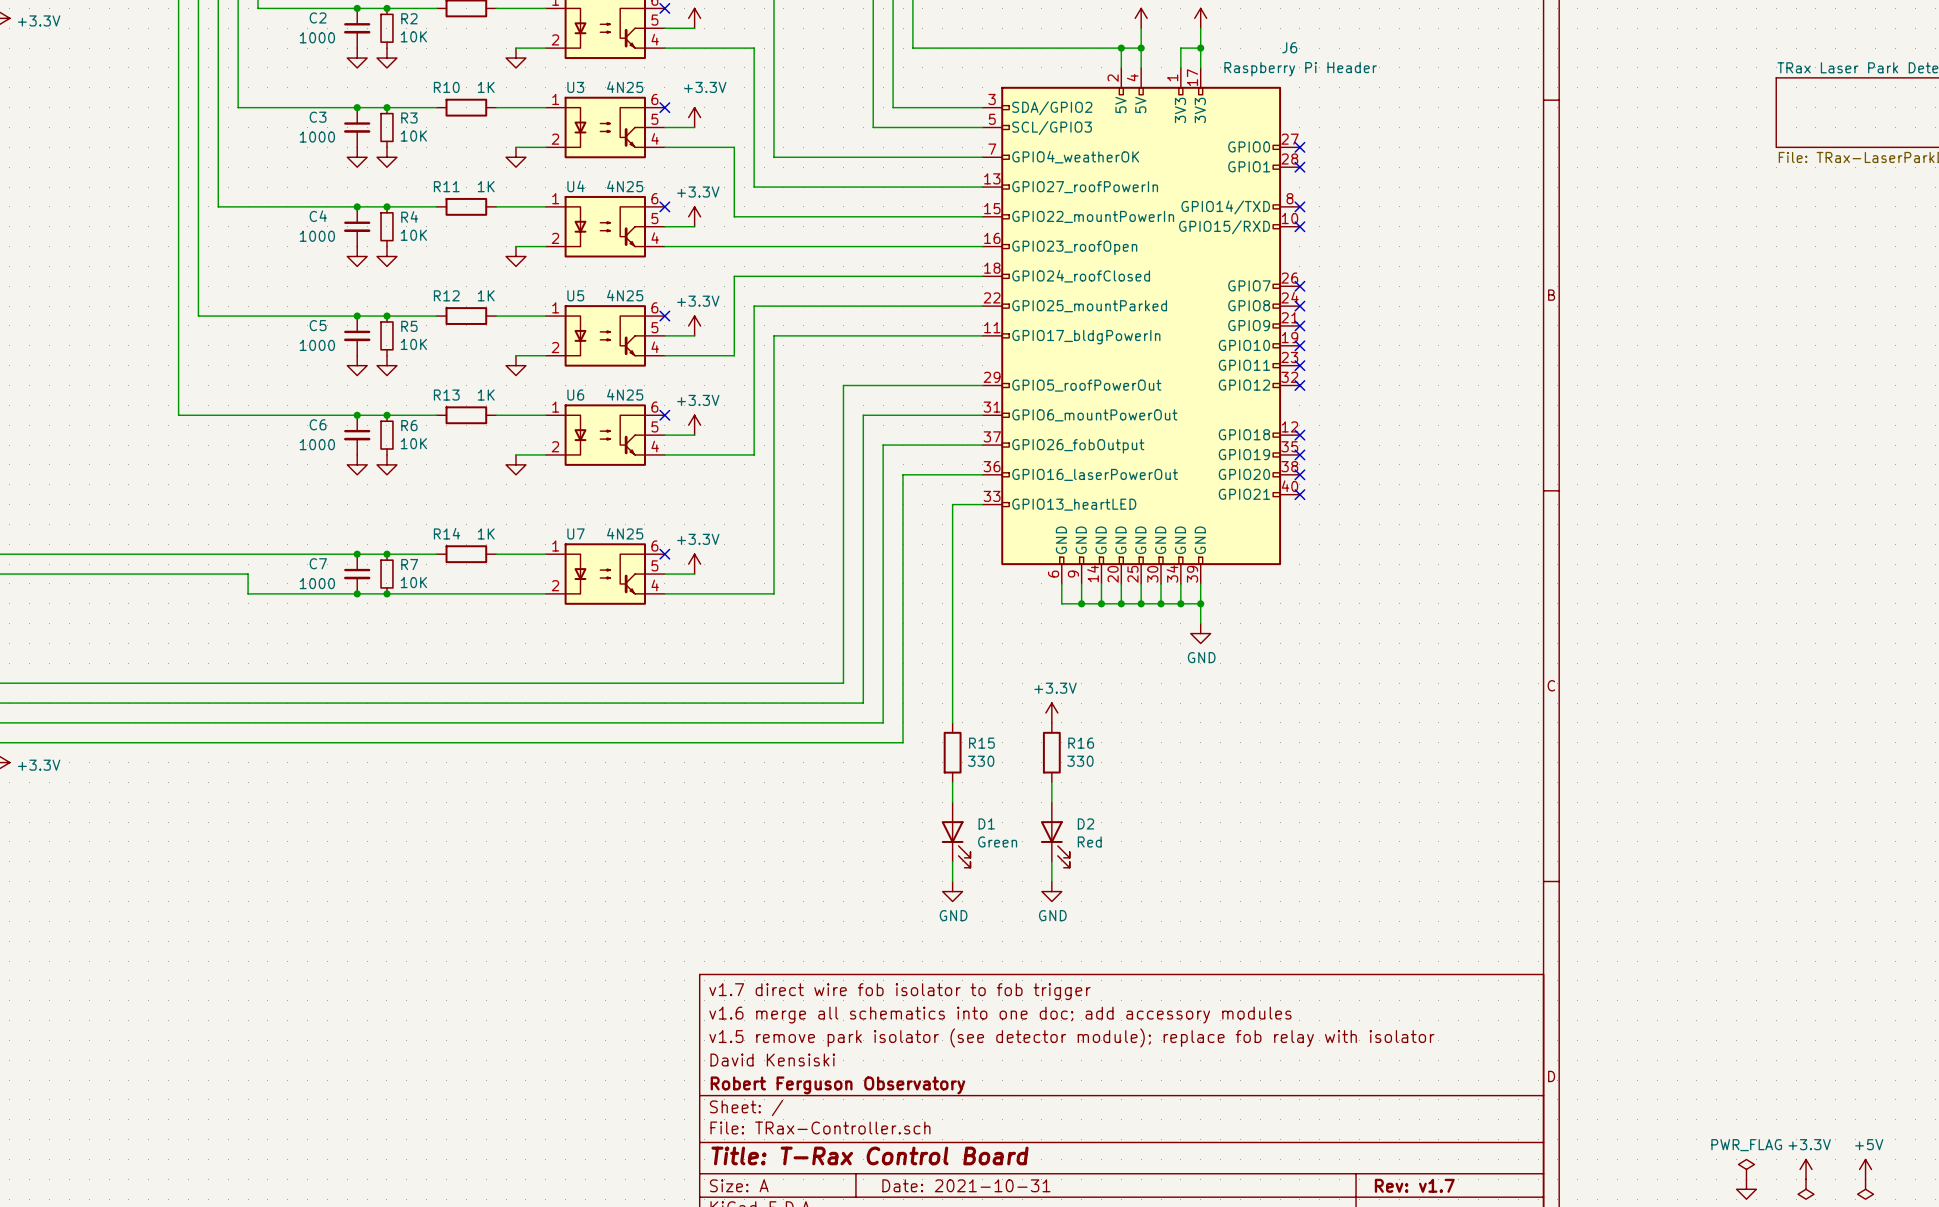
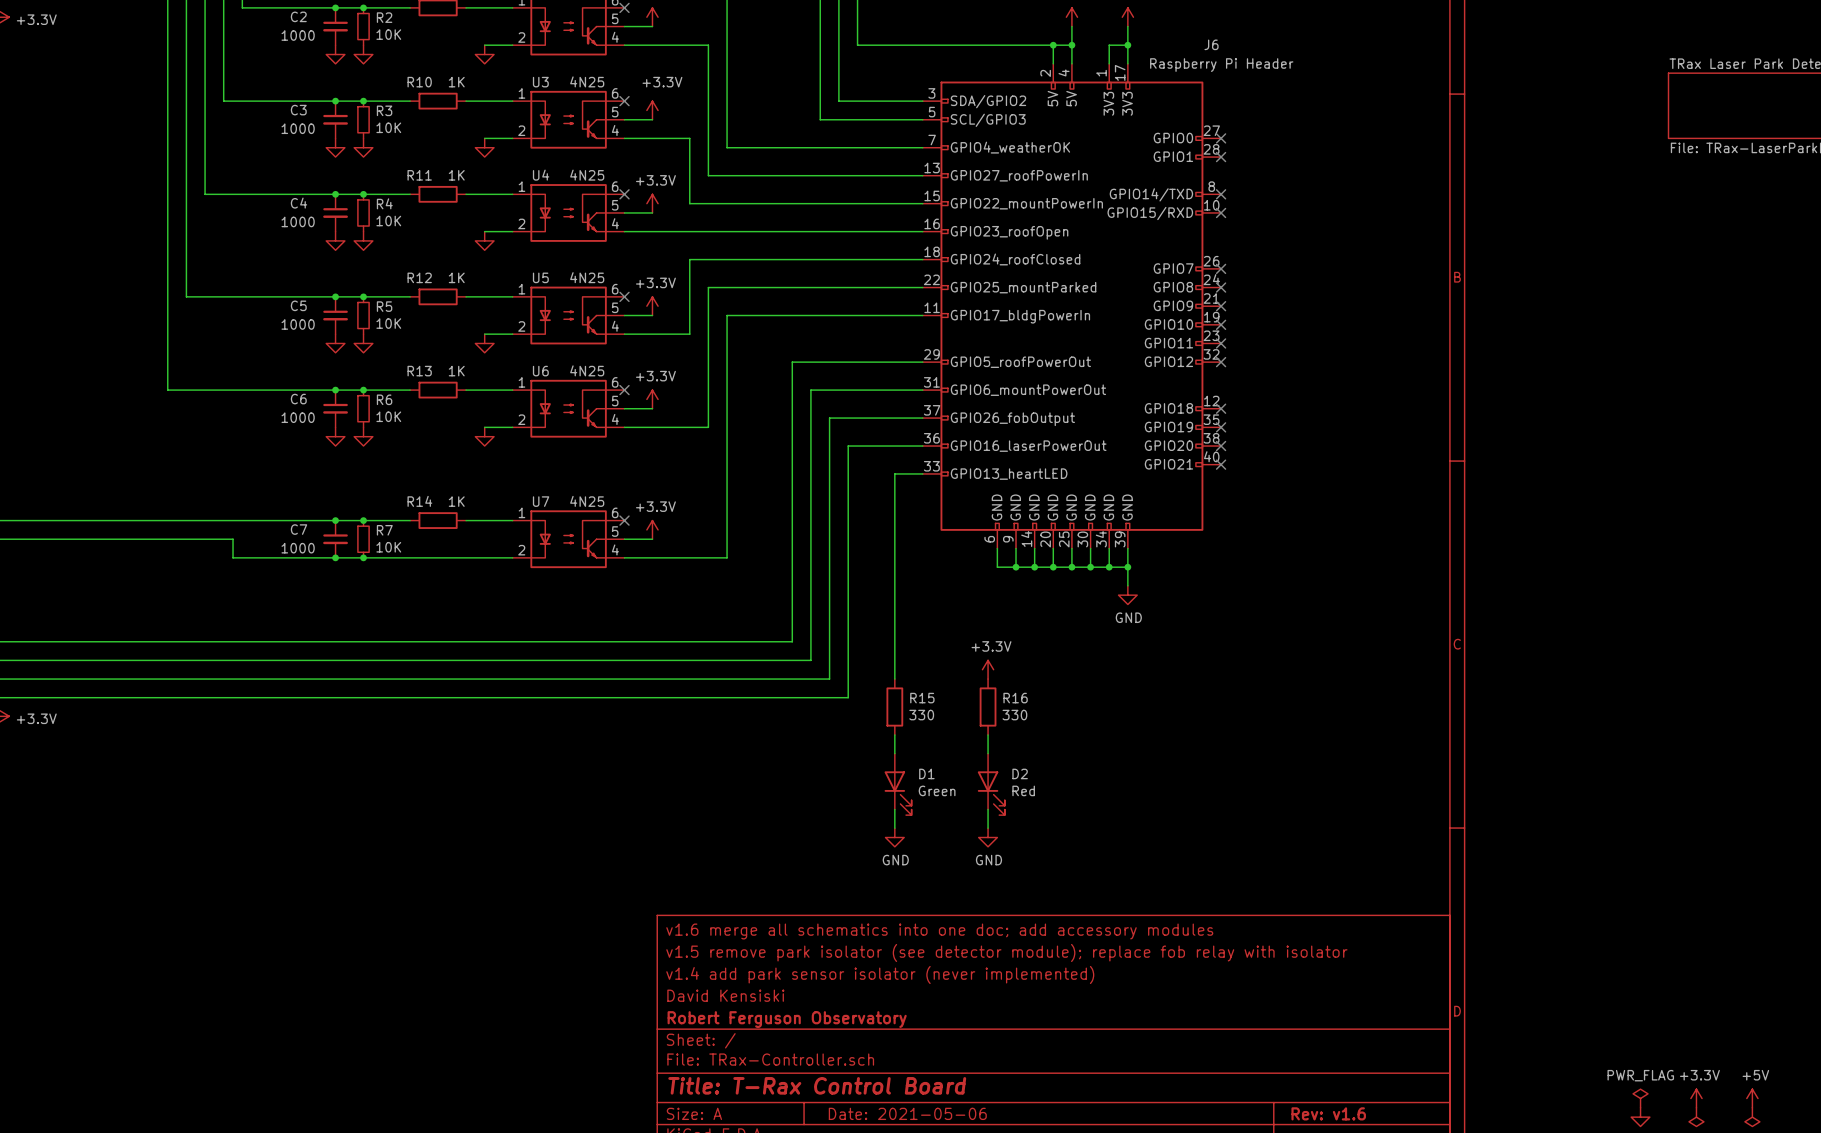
title block: v1.7 direct wire fob isolator to fob trigger (900, 991) -> v1.6 merge all schematics into one doc; add accessory modules (939, 931)
title block: v1.6 merge all schematics into one doc; add accessory modules (1000, 1015) -> v1.5 remove park isolator (see detector module); replace fob relay with isolator (1006, 952)
title block: v1.5 remove park isolator (see detector module); replace fob relay with isolator (1071, 1037) -> v1.4 add park sensor isolator (never implemented) (880, 975)
title block: Date: 2021-10-31 (966, 1185) -> Date: 2021-05-06 (907, 1113)
title block: Rev: v1.7 (1414, 1185) -> Rev: v1.6 (1328, 1113)

